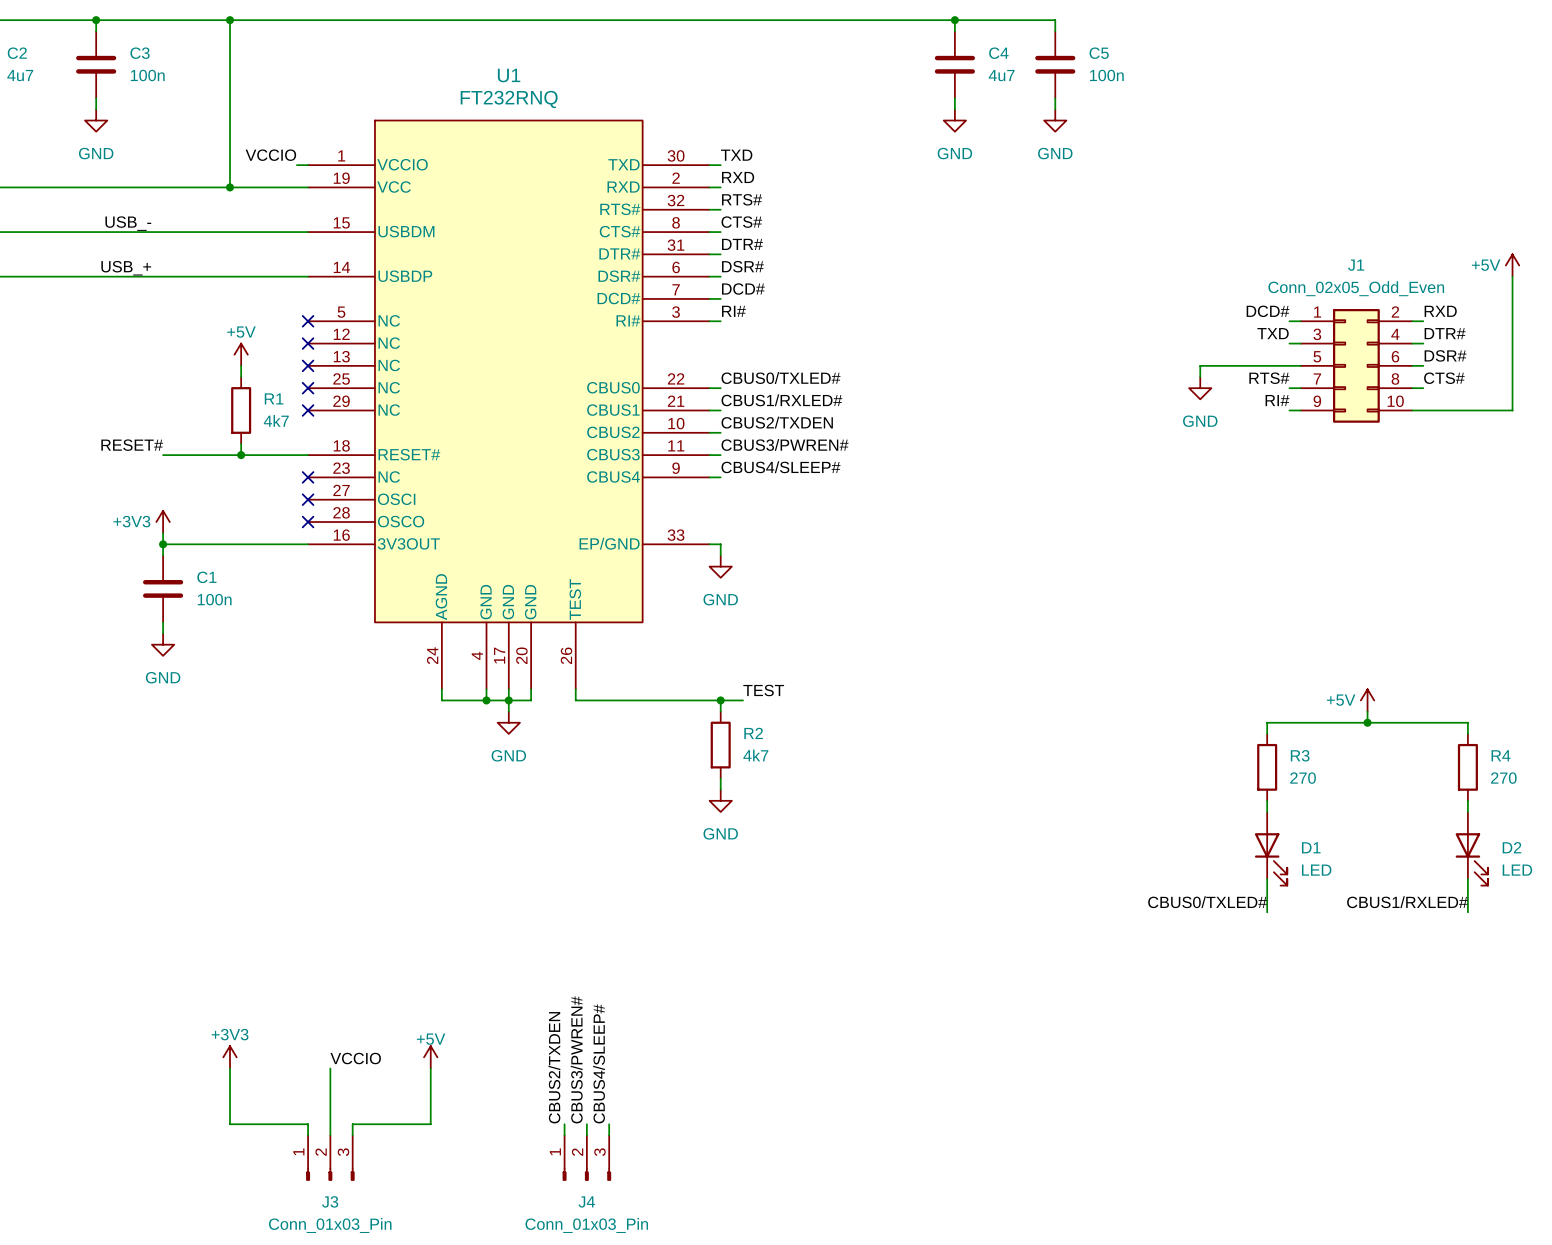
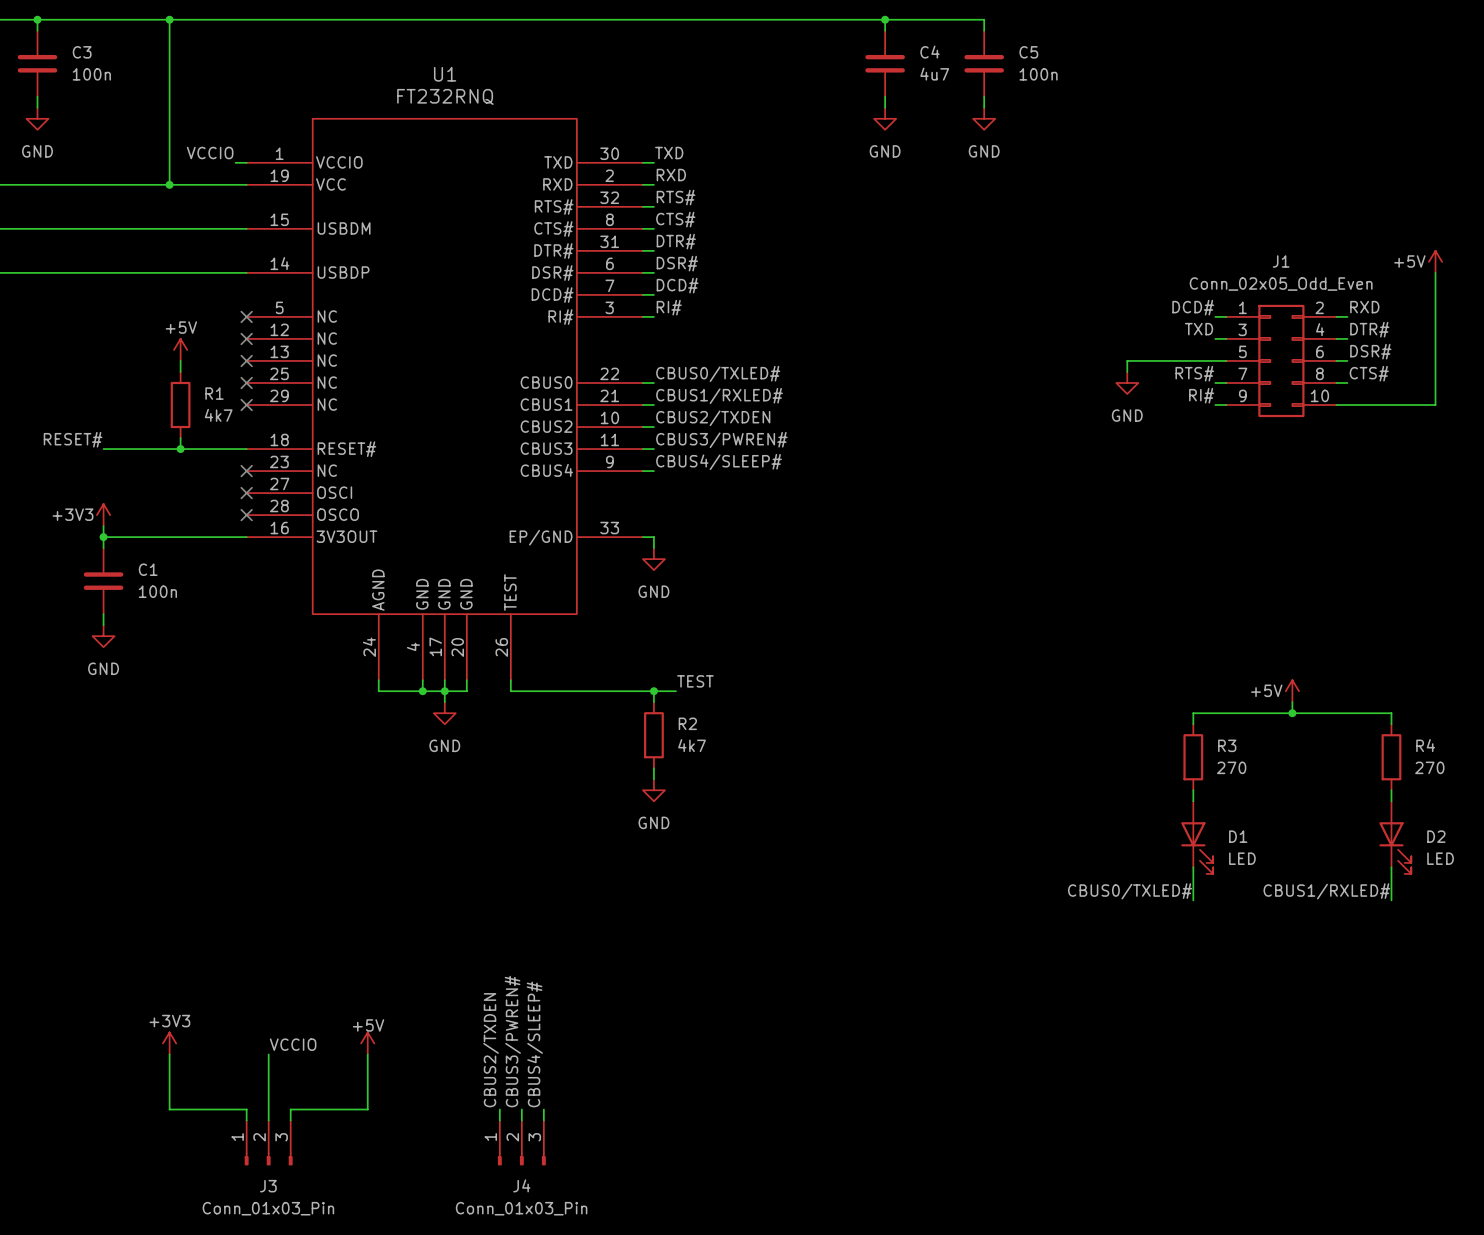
label: USB_- (128, 223) -> none
label: USB_+ (126, 268) -> none

